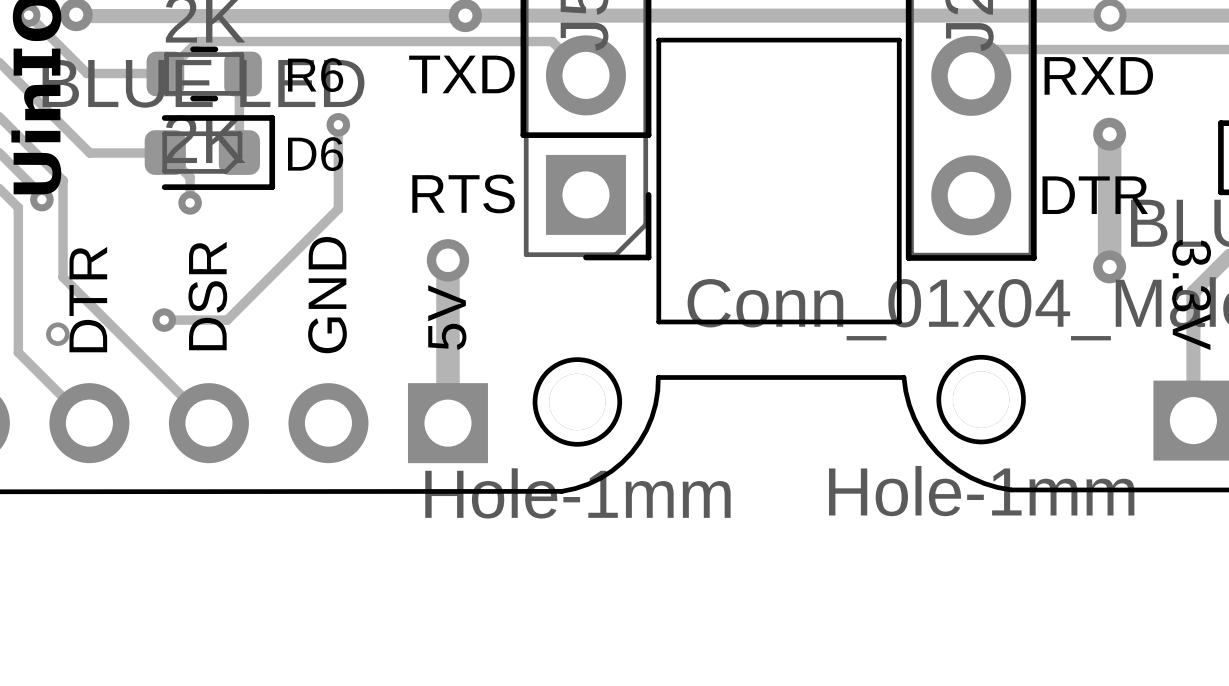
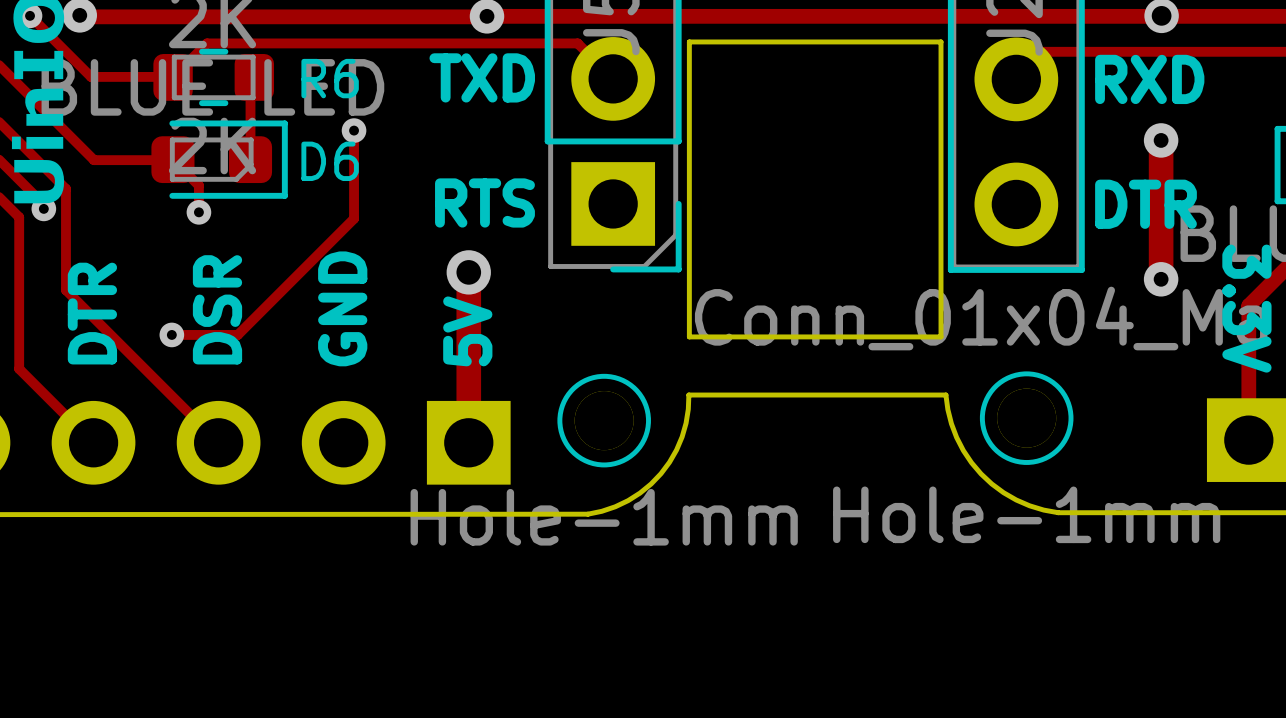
via: (57, 334) -> none

